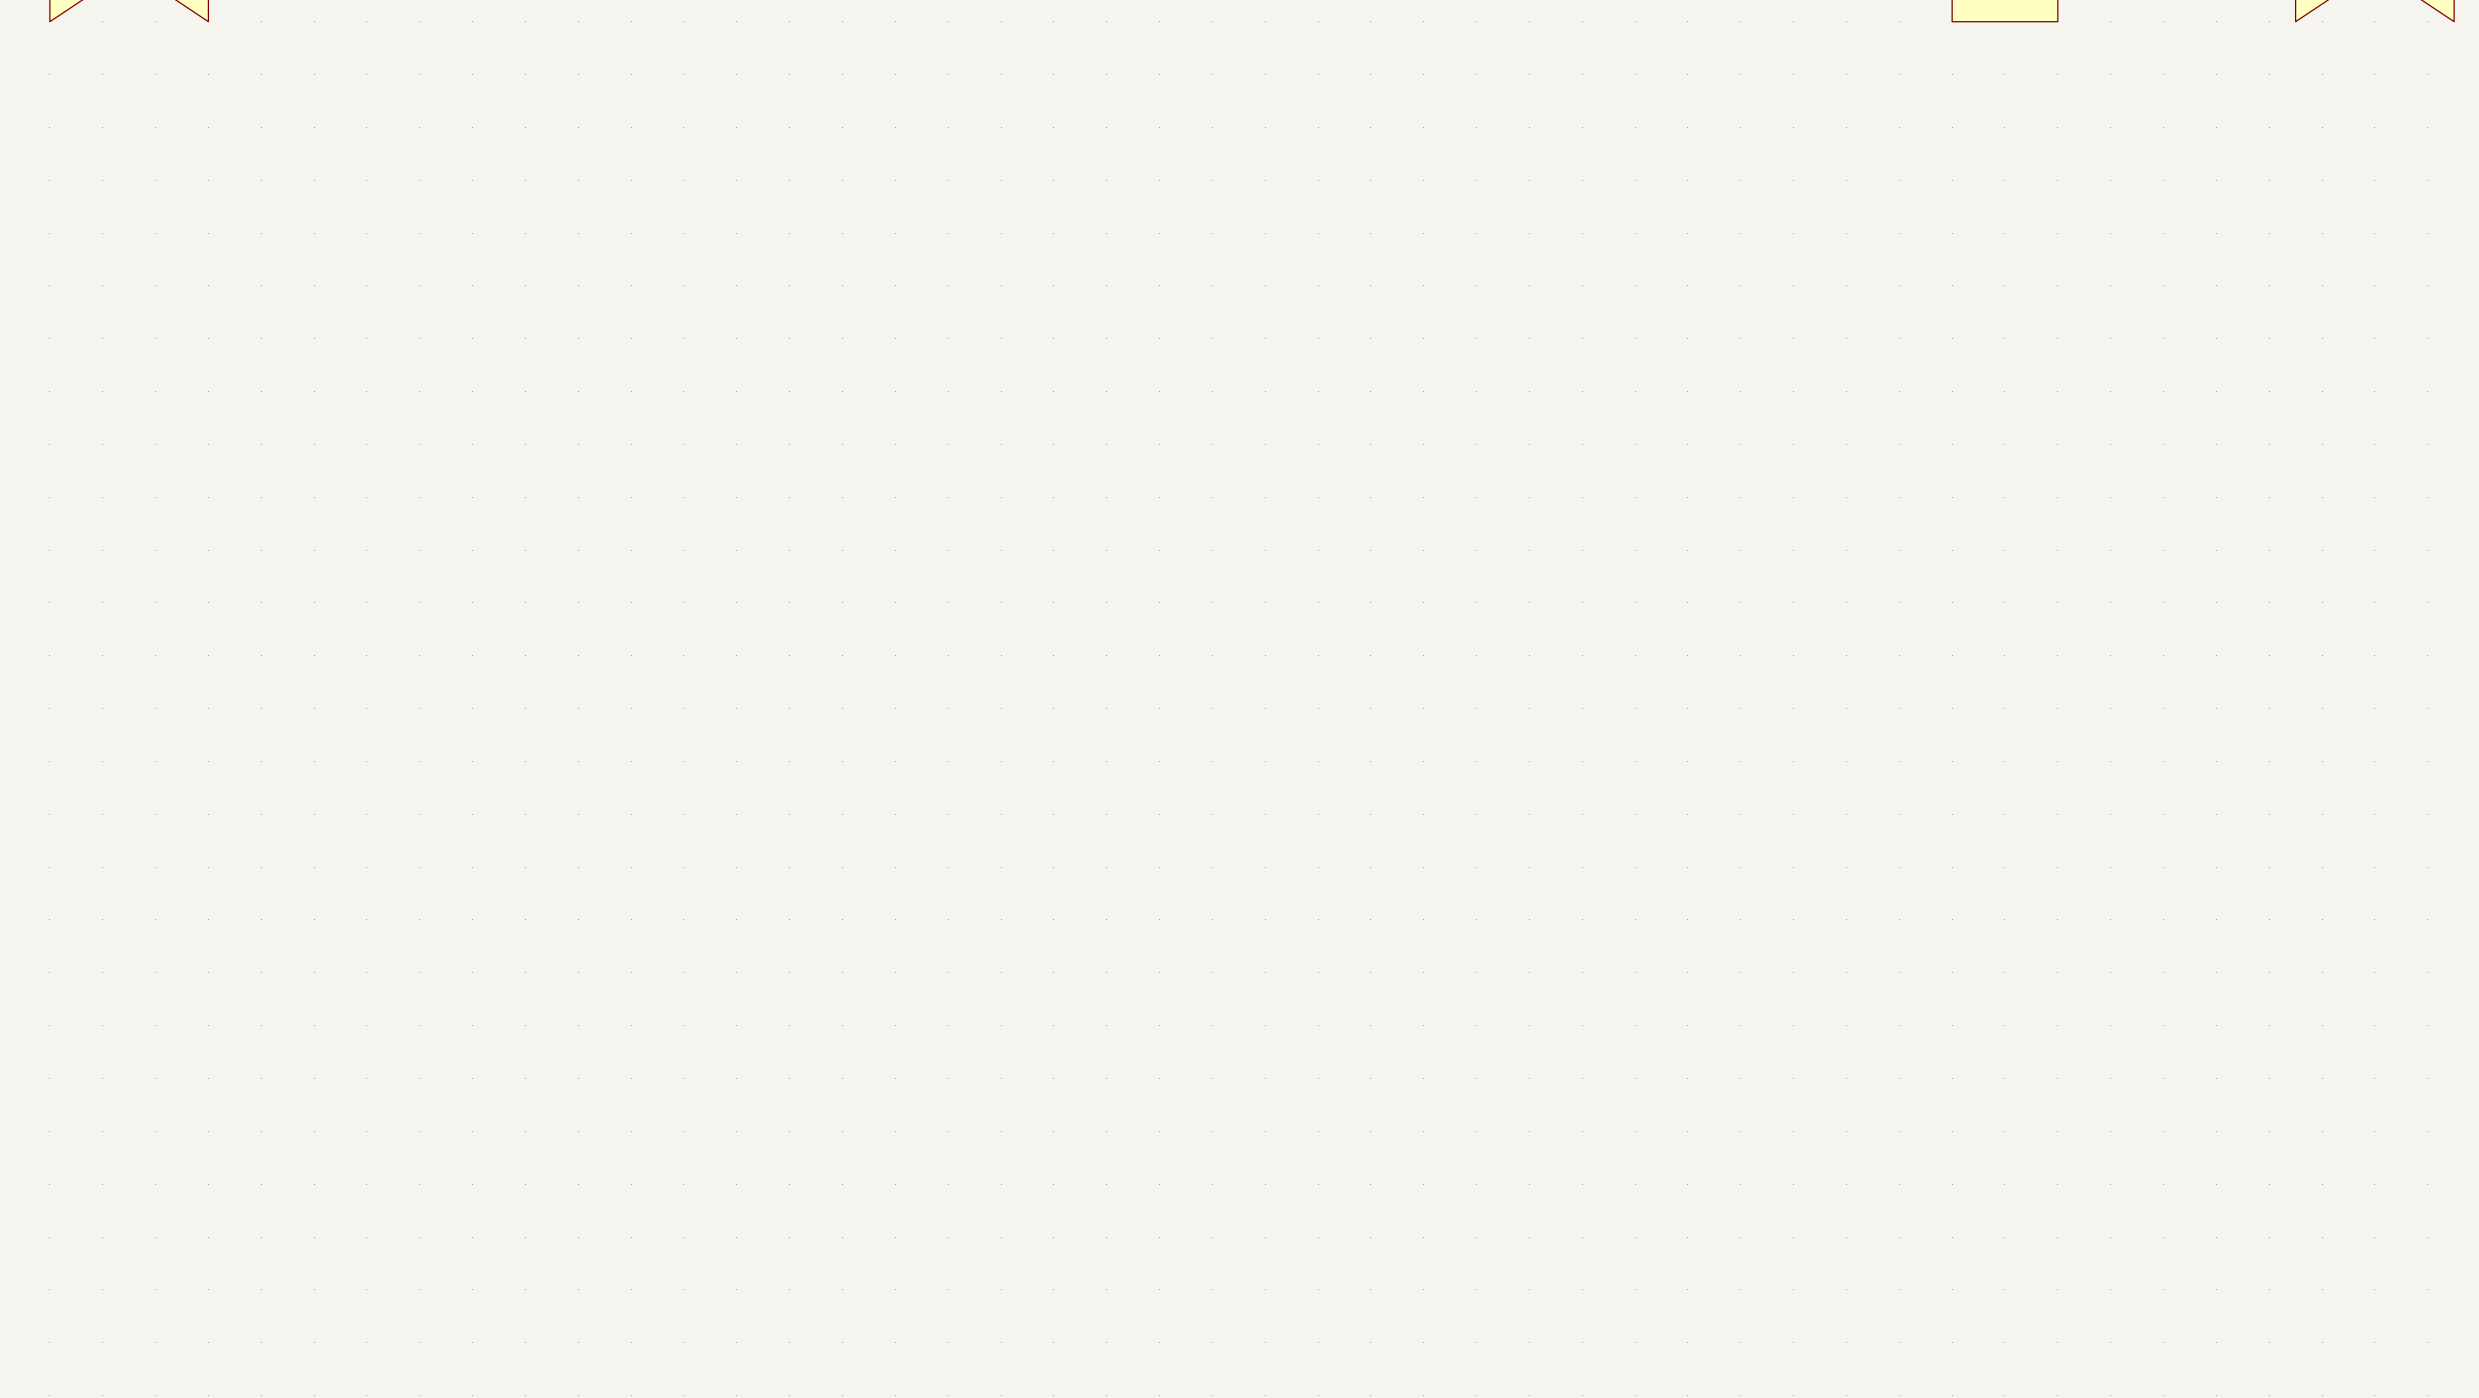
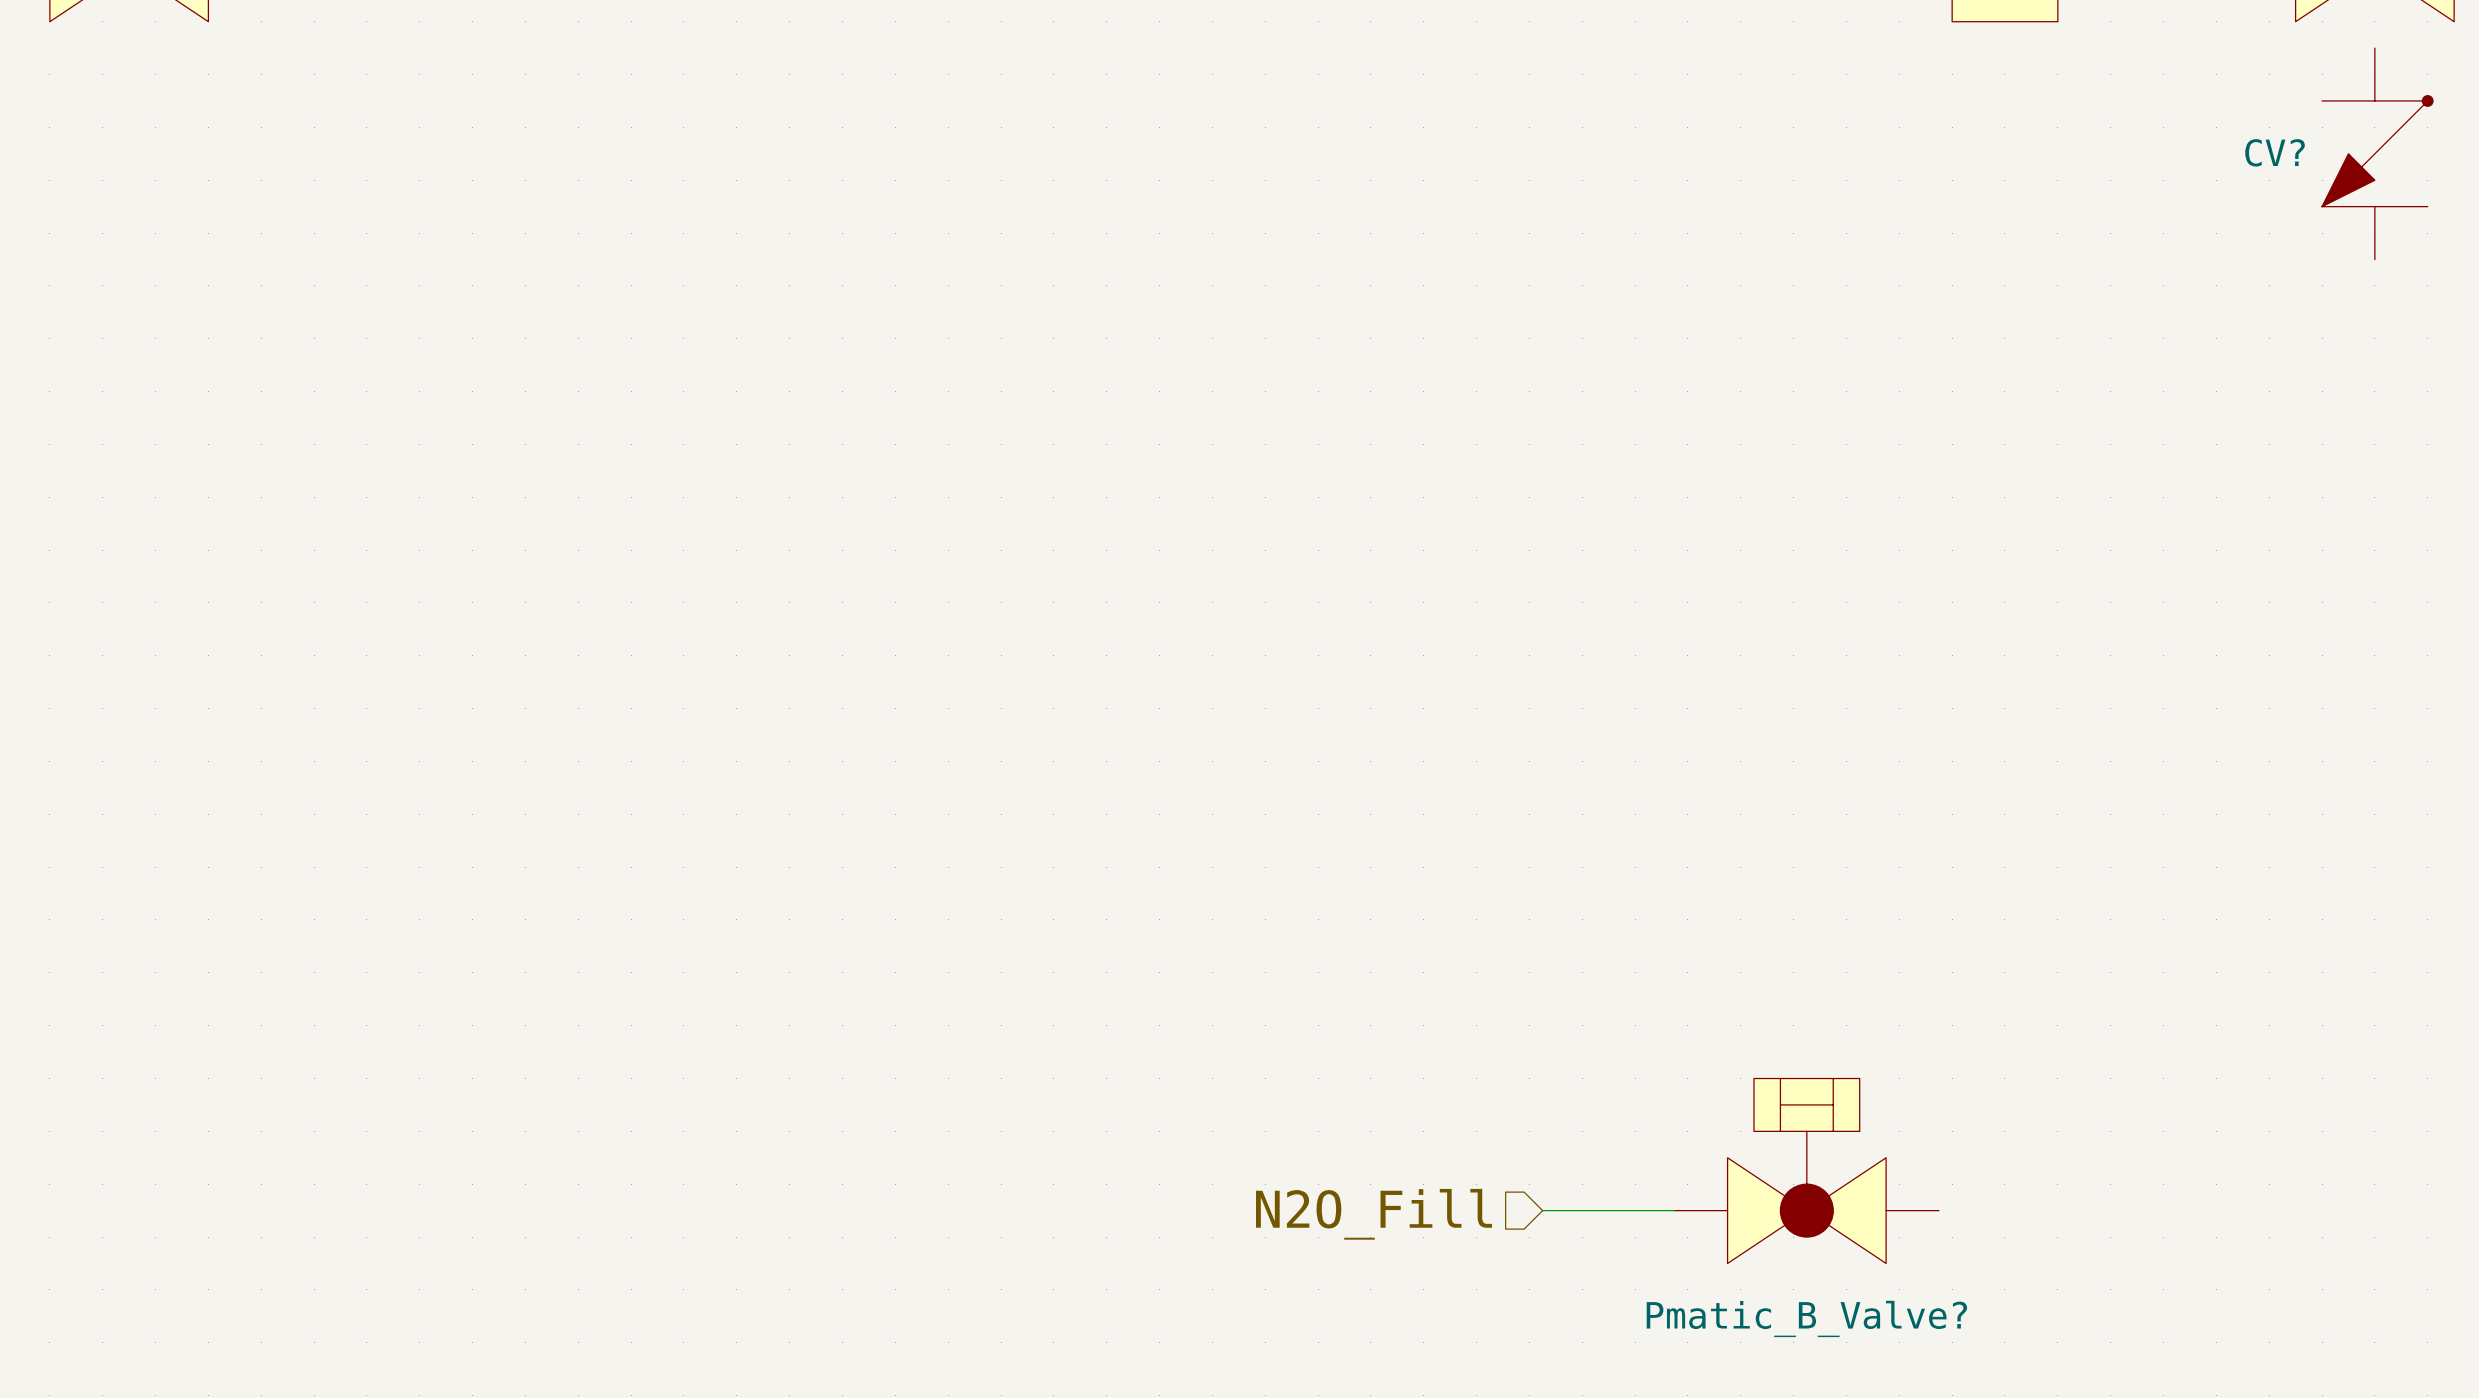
CV?: none -> (2377, 153)
Pmatic_B_Valve?: none -> (1806, 1170)
wire: none -> (1542, 1210) (1674, 1210)
hierarchical label: none -> N2O_Fill (1374, 1214)

